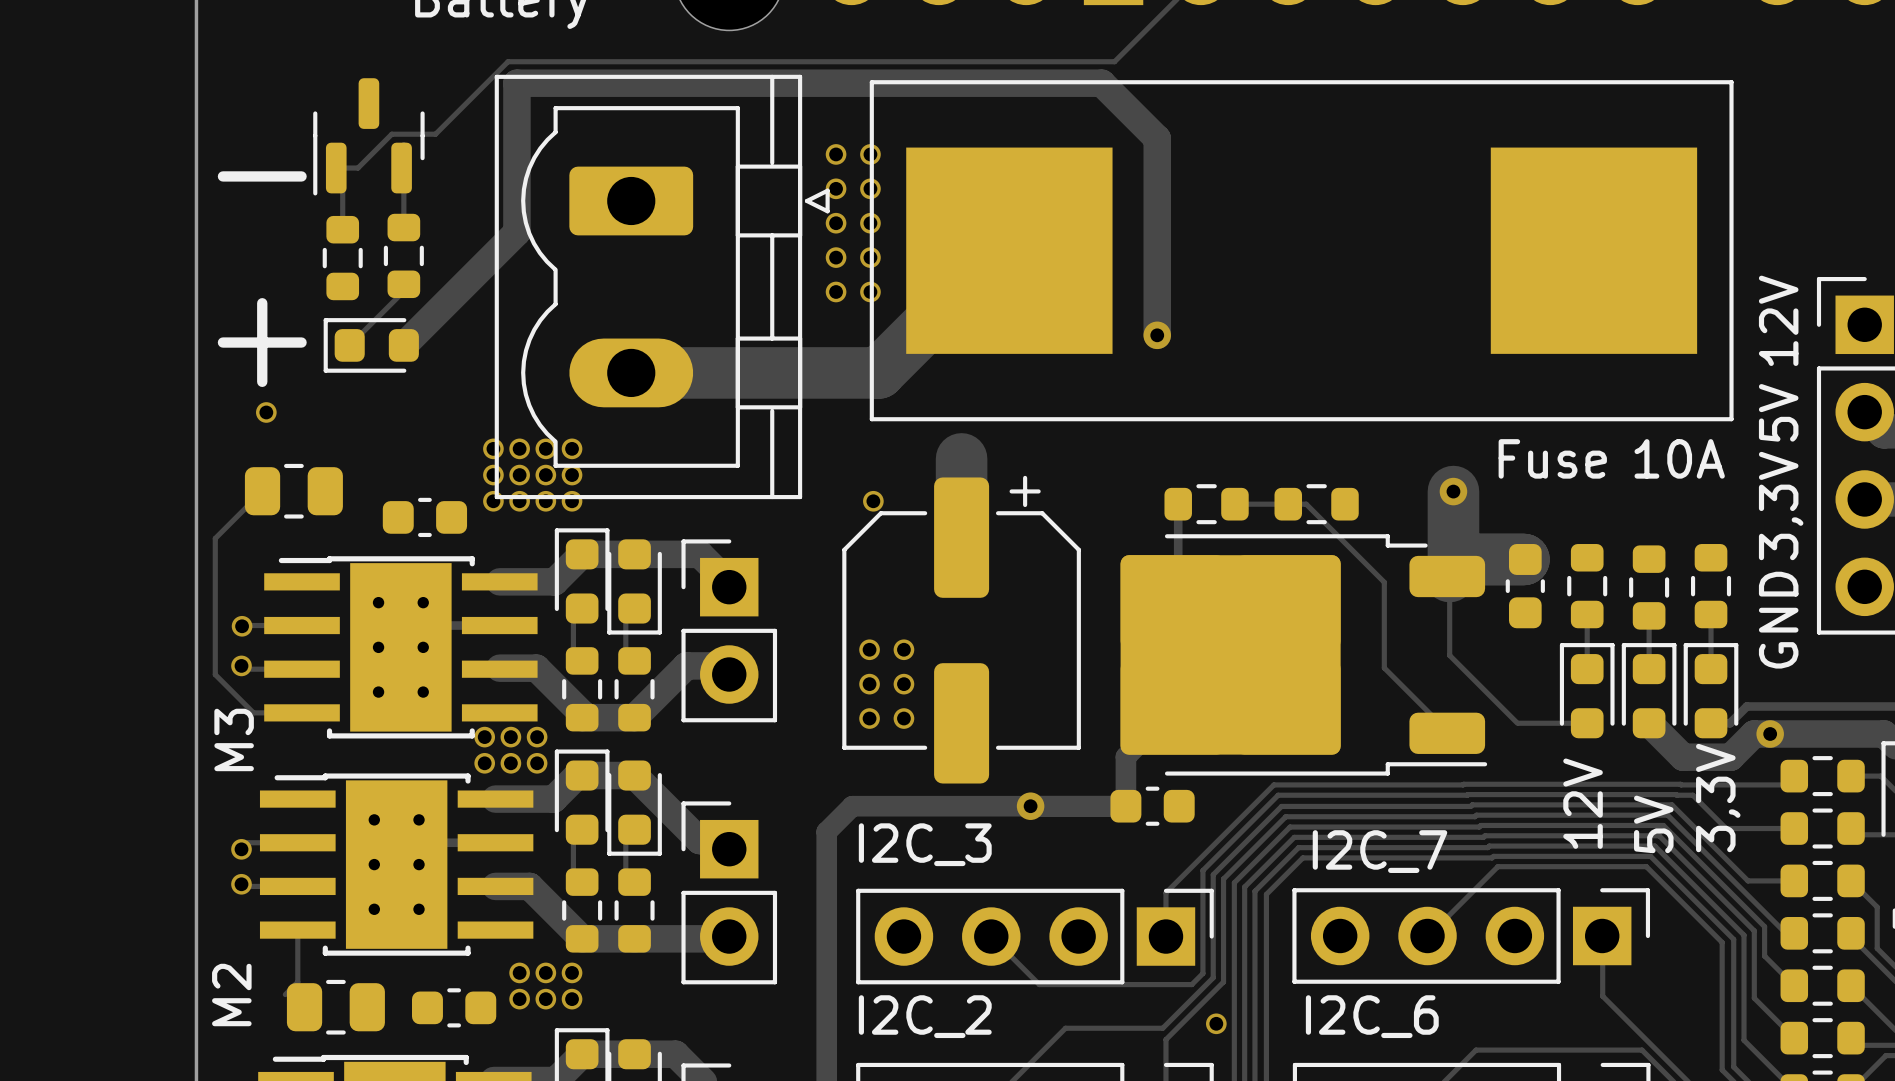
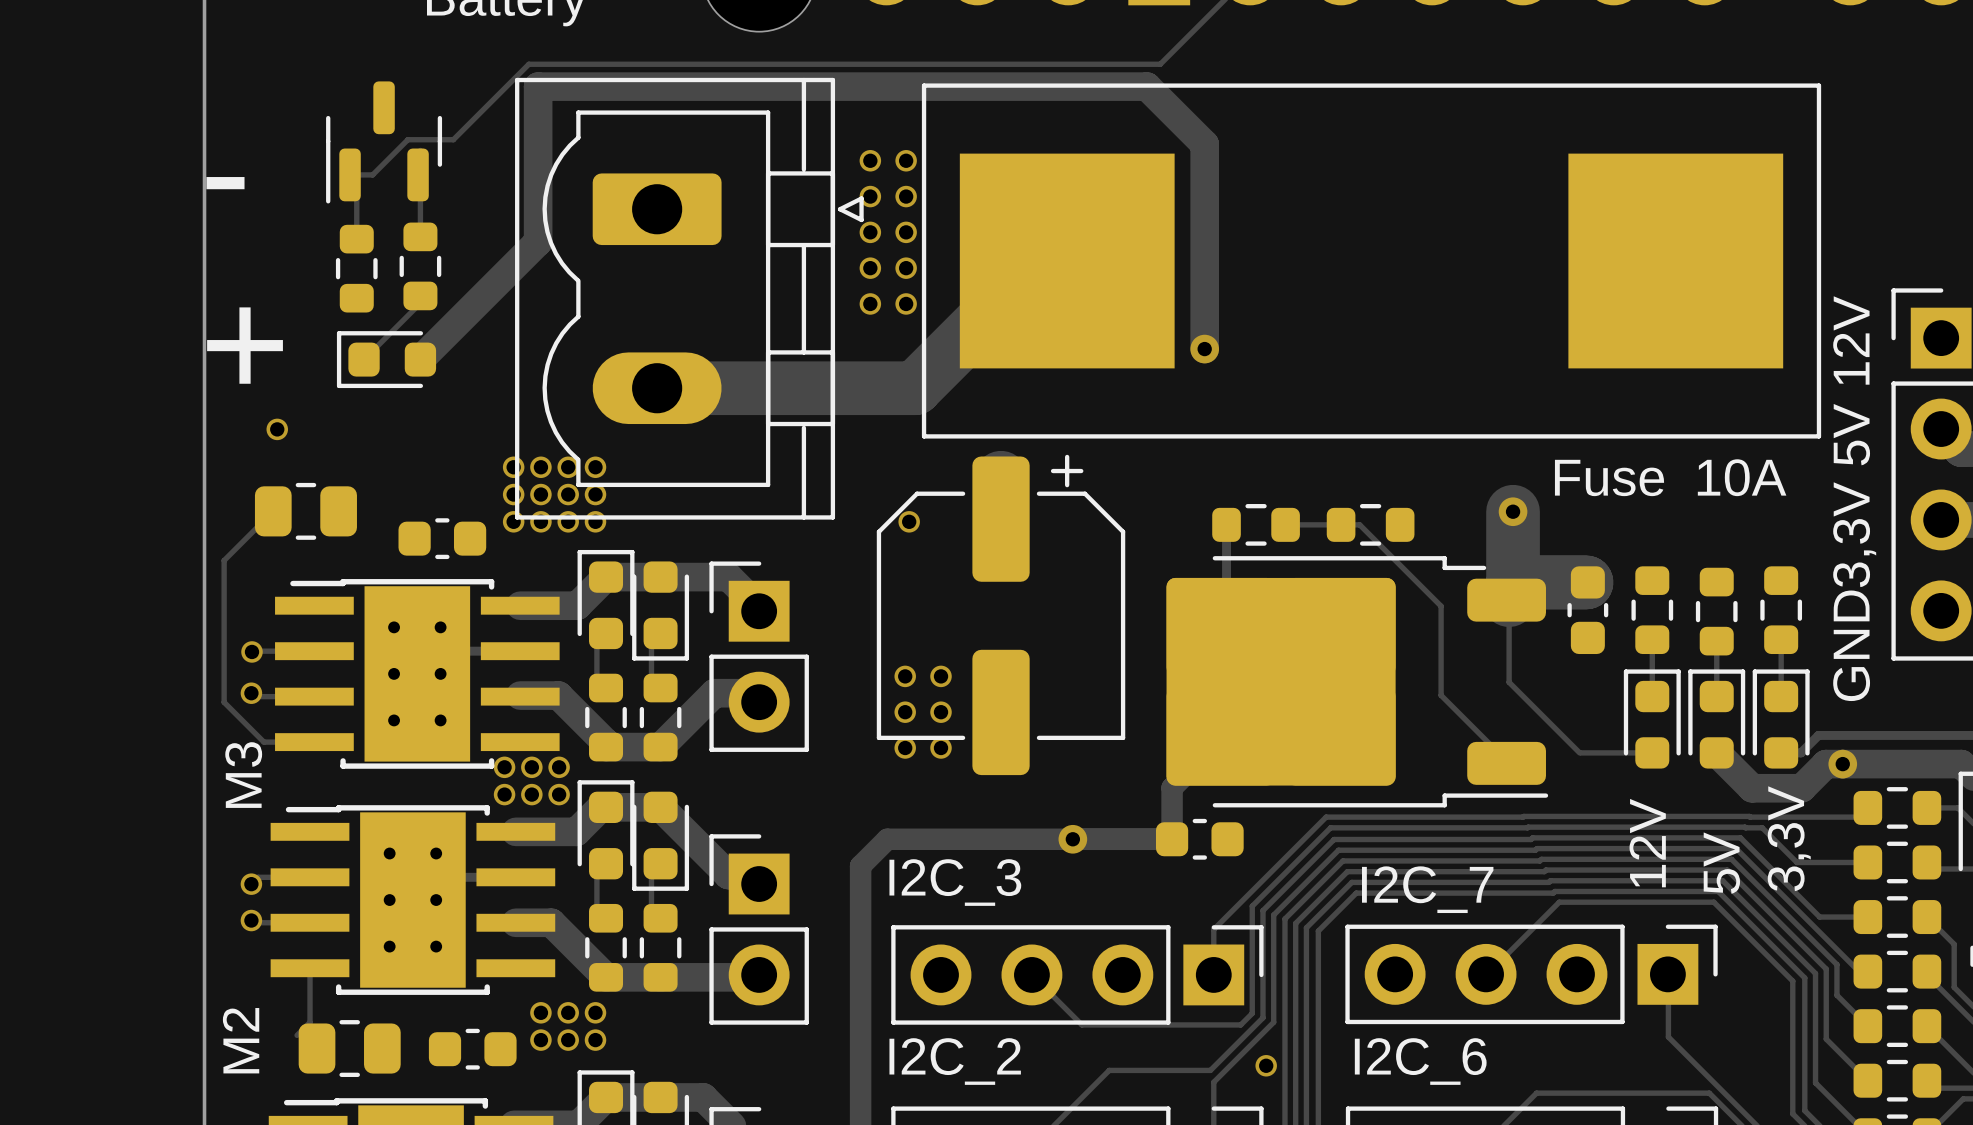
part position: (1301, 250) -> (1371, 261)
part position: (961, 629) -> (1001, 614)

